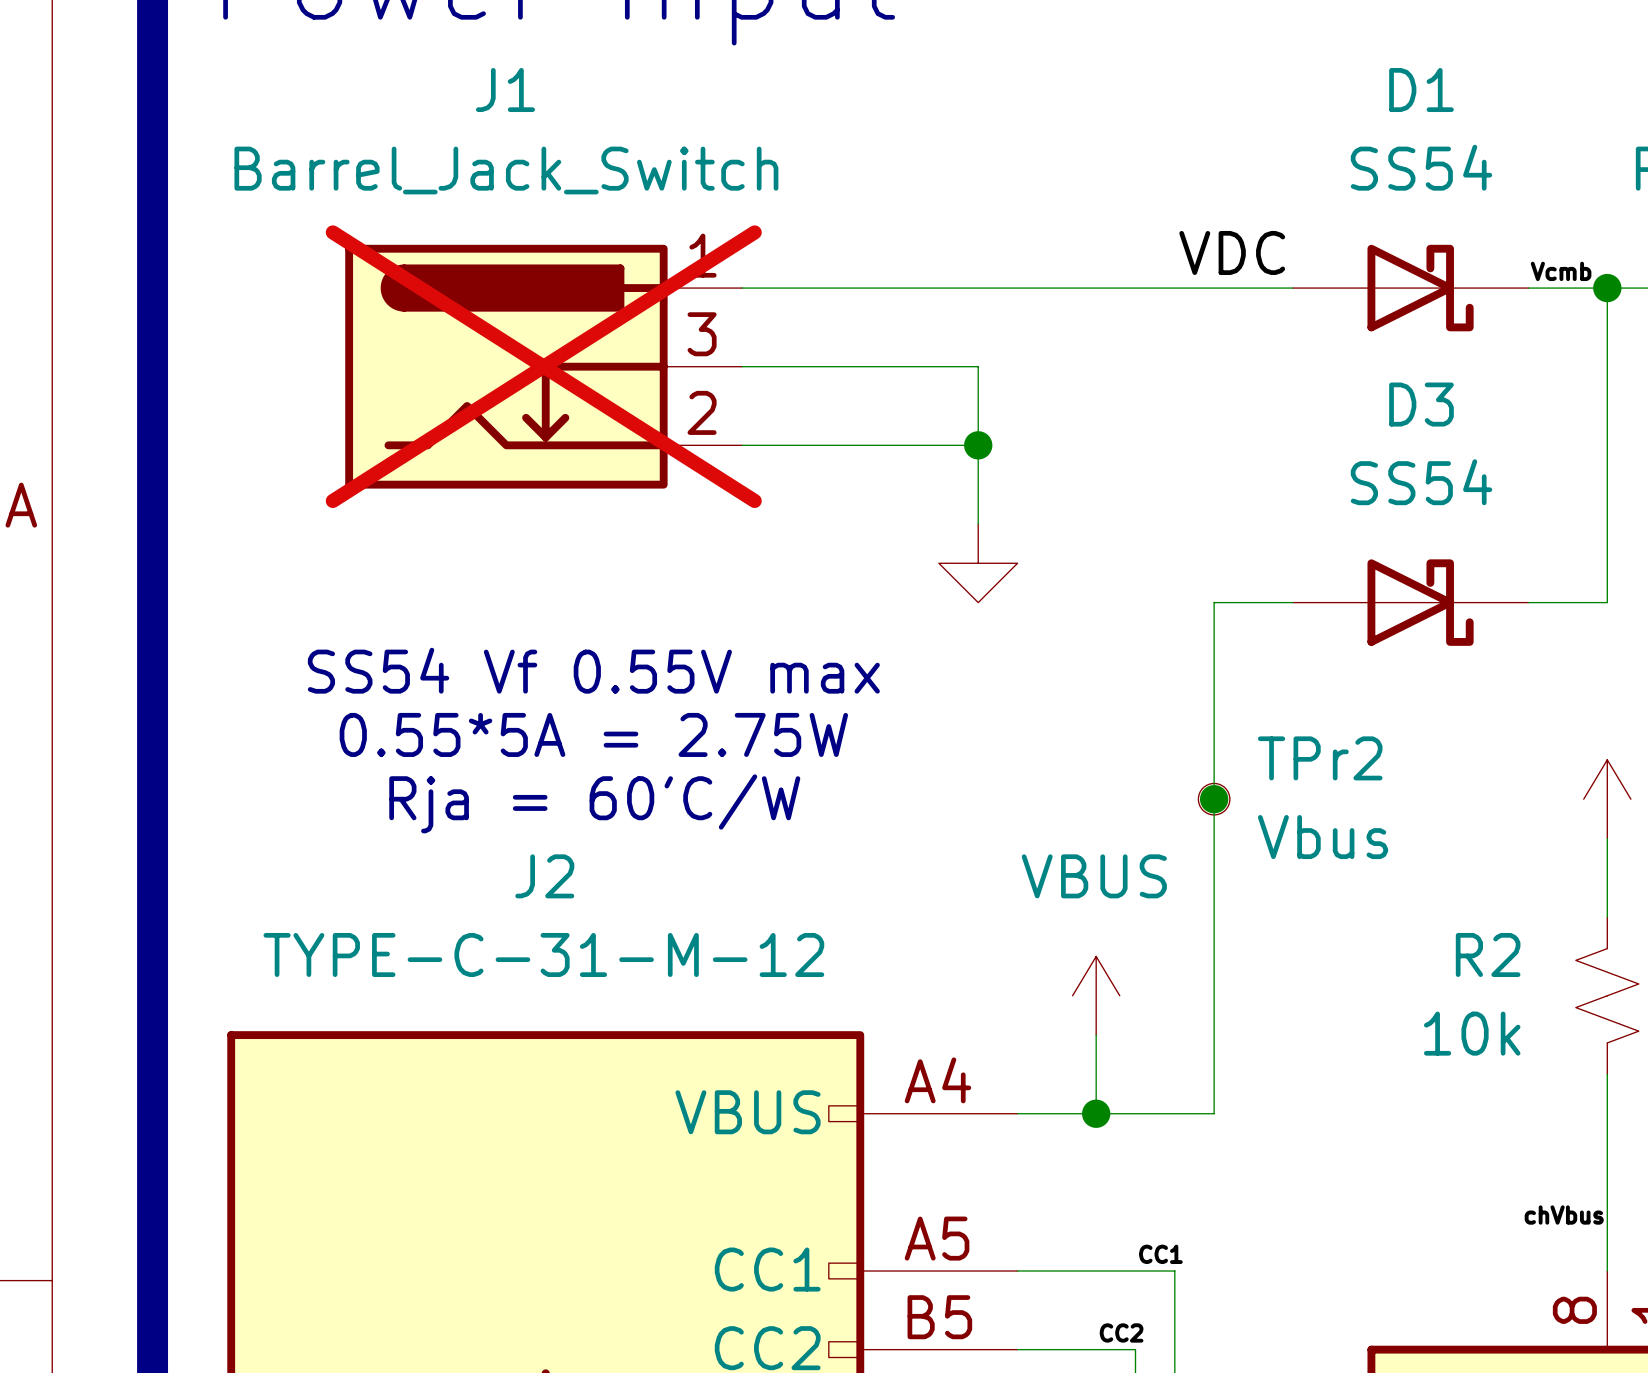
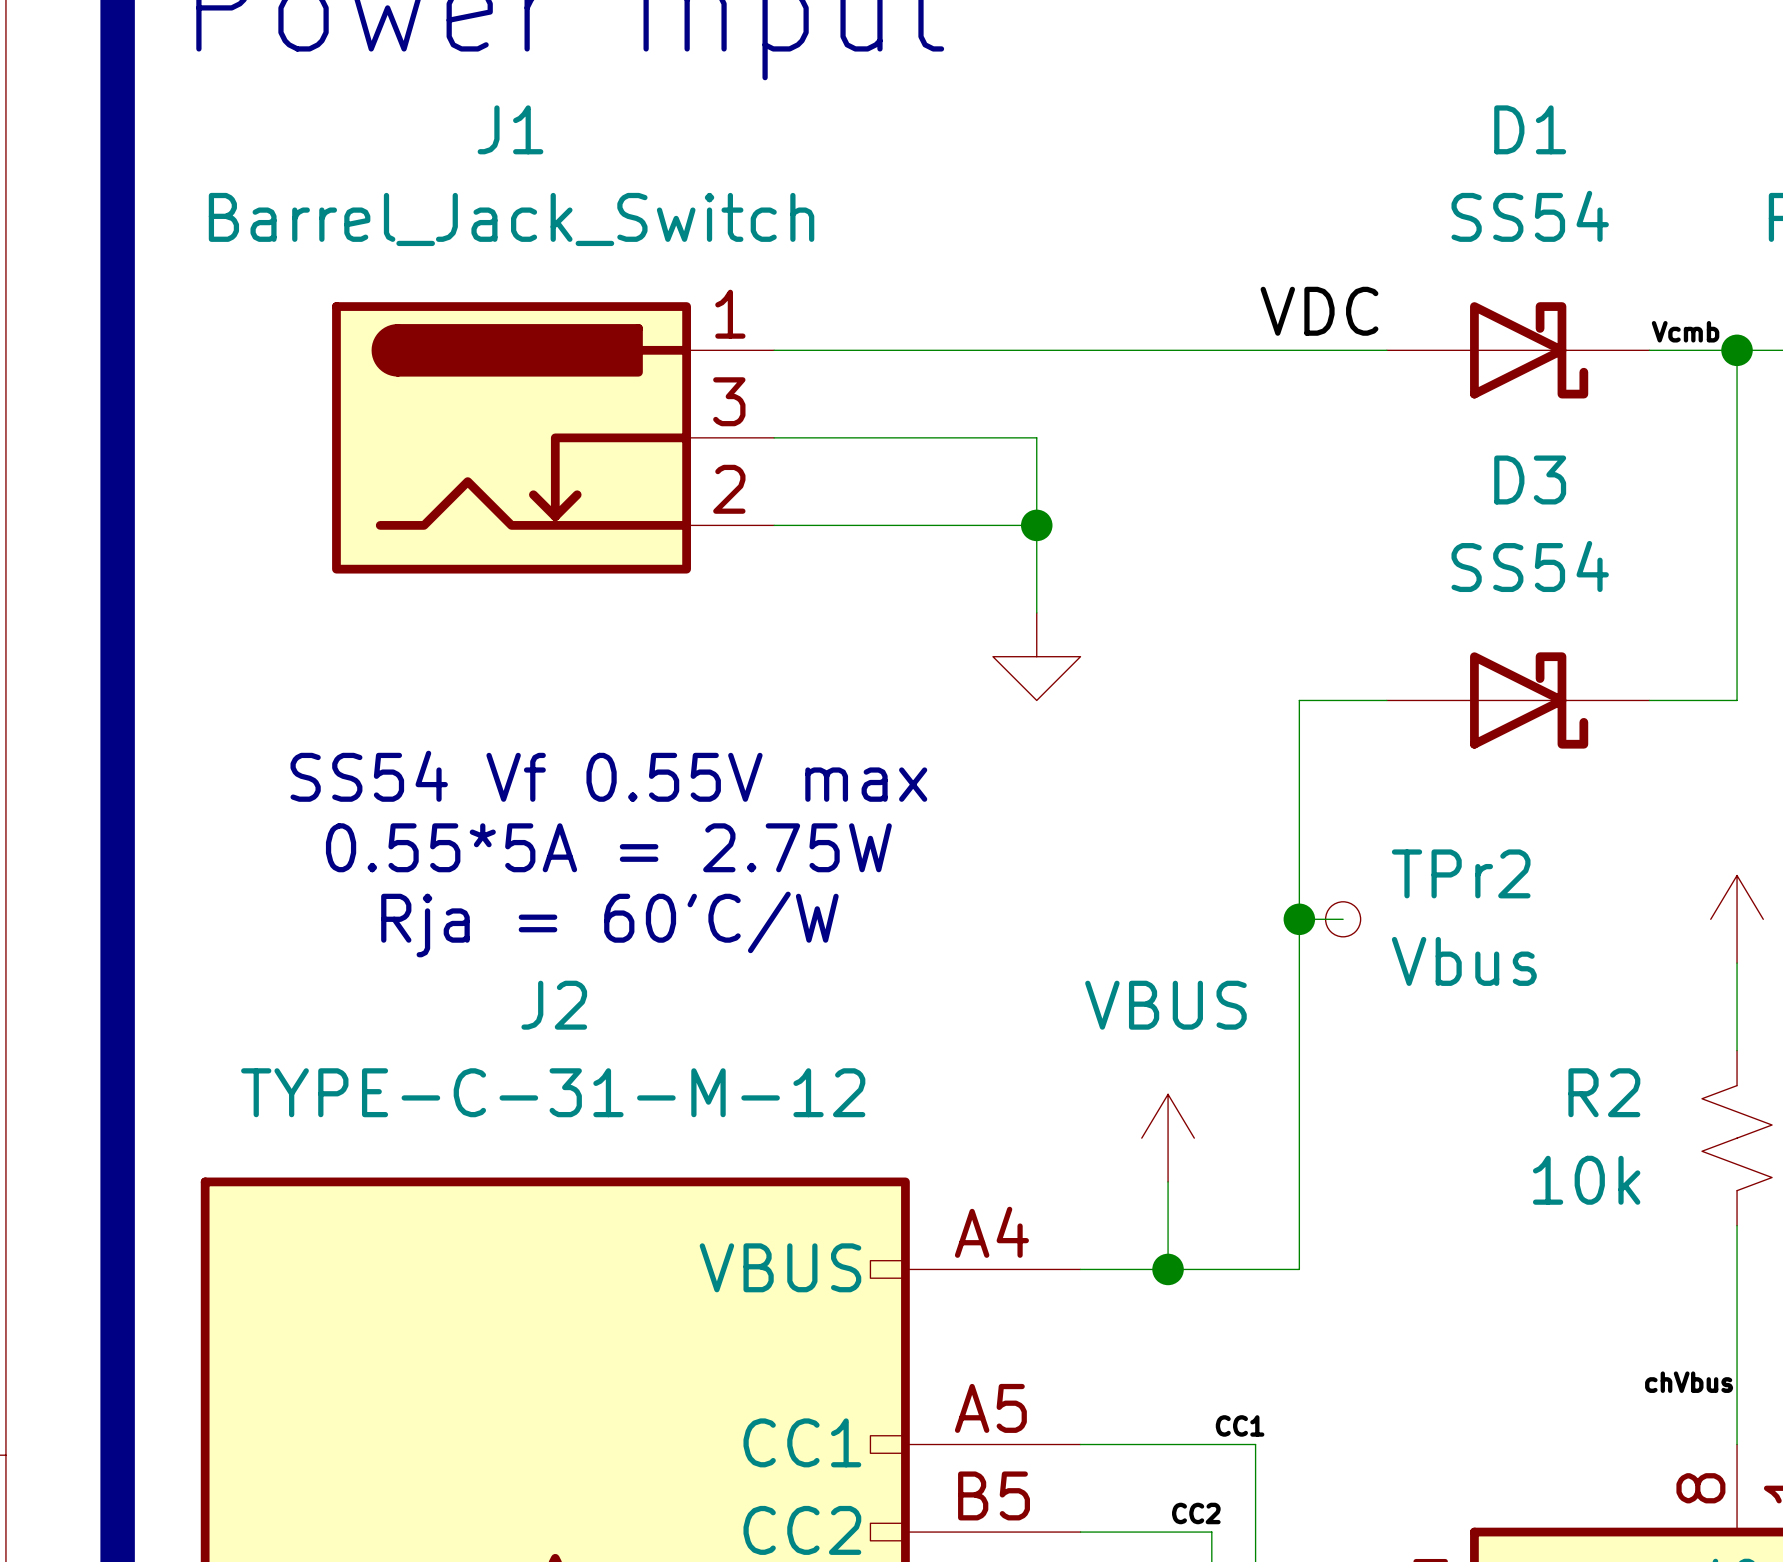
J1 do-not-place cross: (543, 366) -> none
wire: none -> (1299, 919) (1343, 919)
TPr2 position: (1214, 799) -> (1343, 919)

